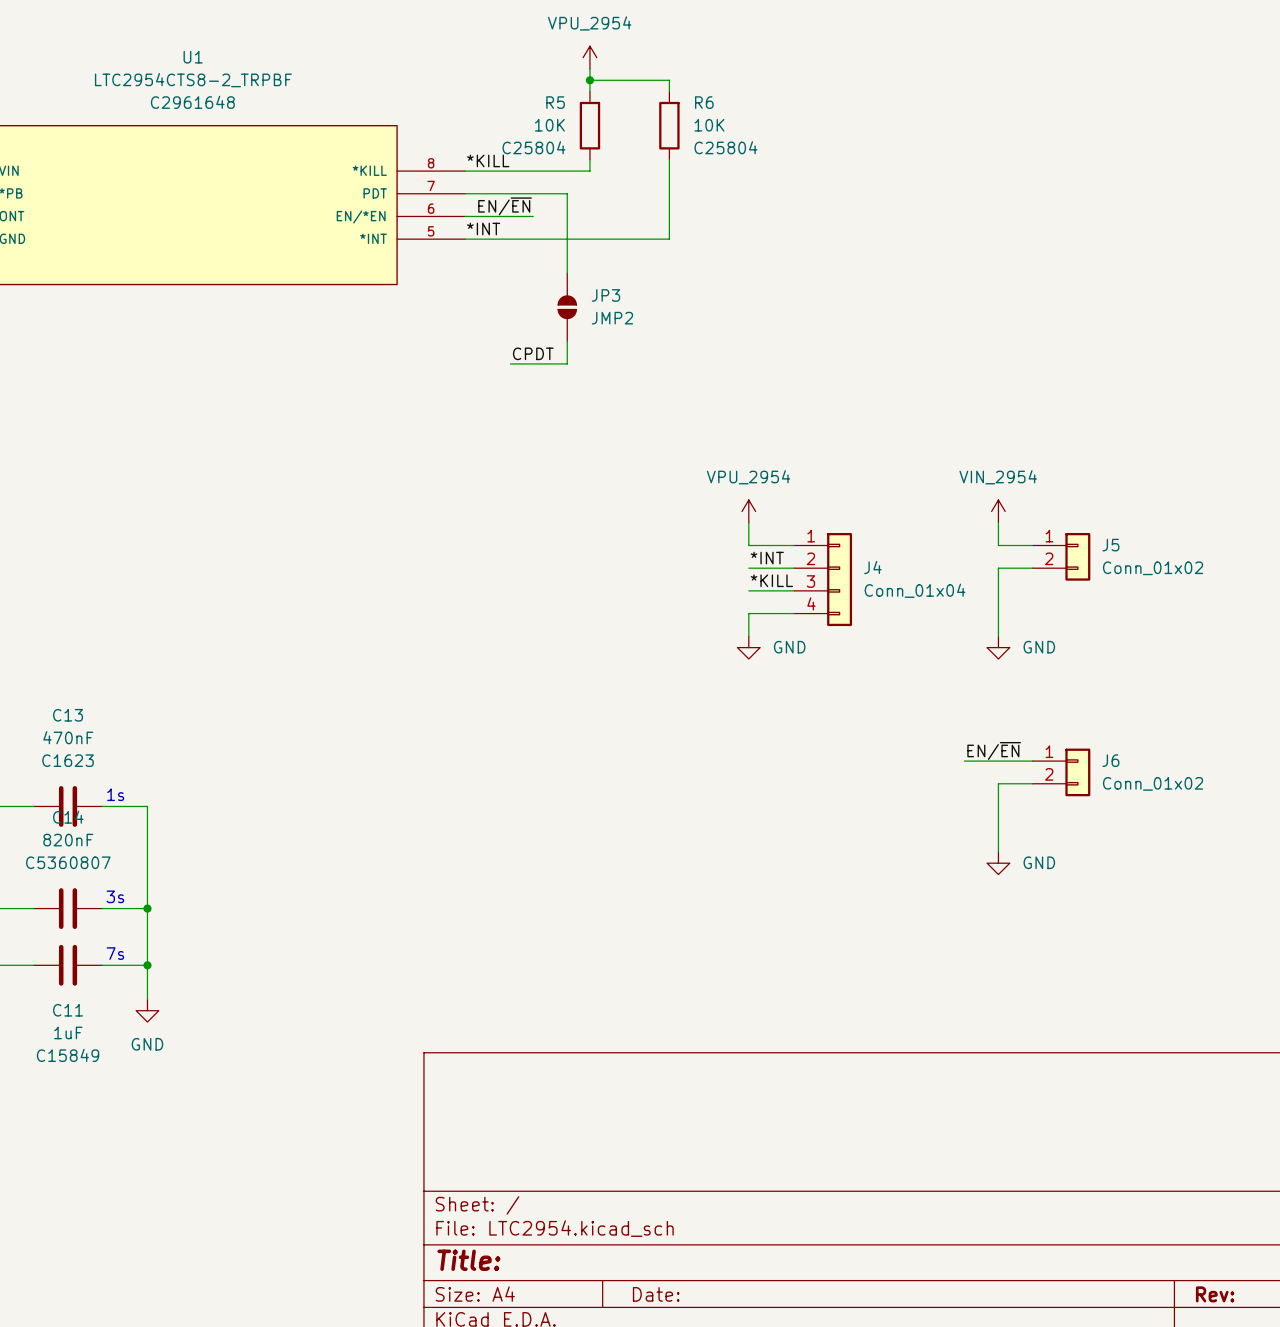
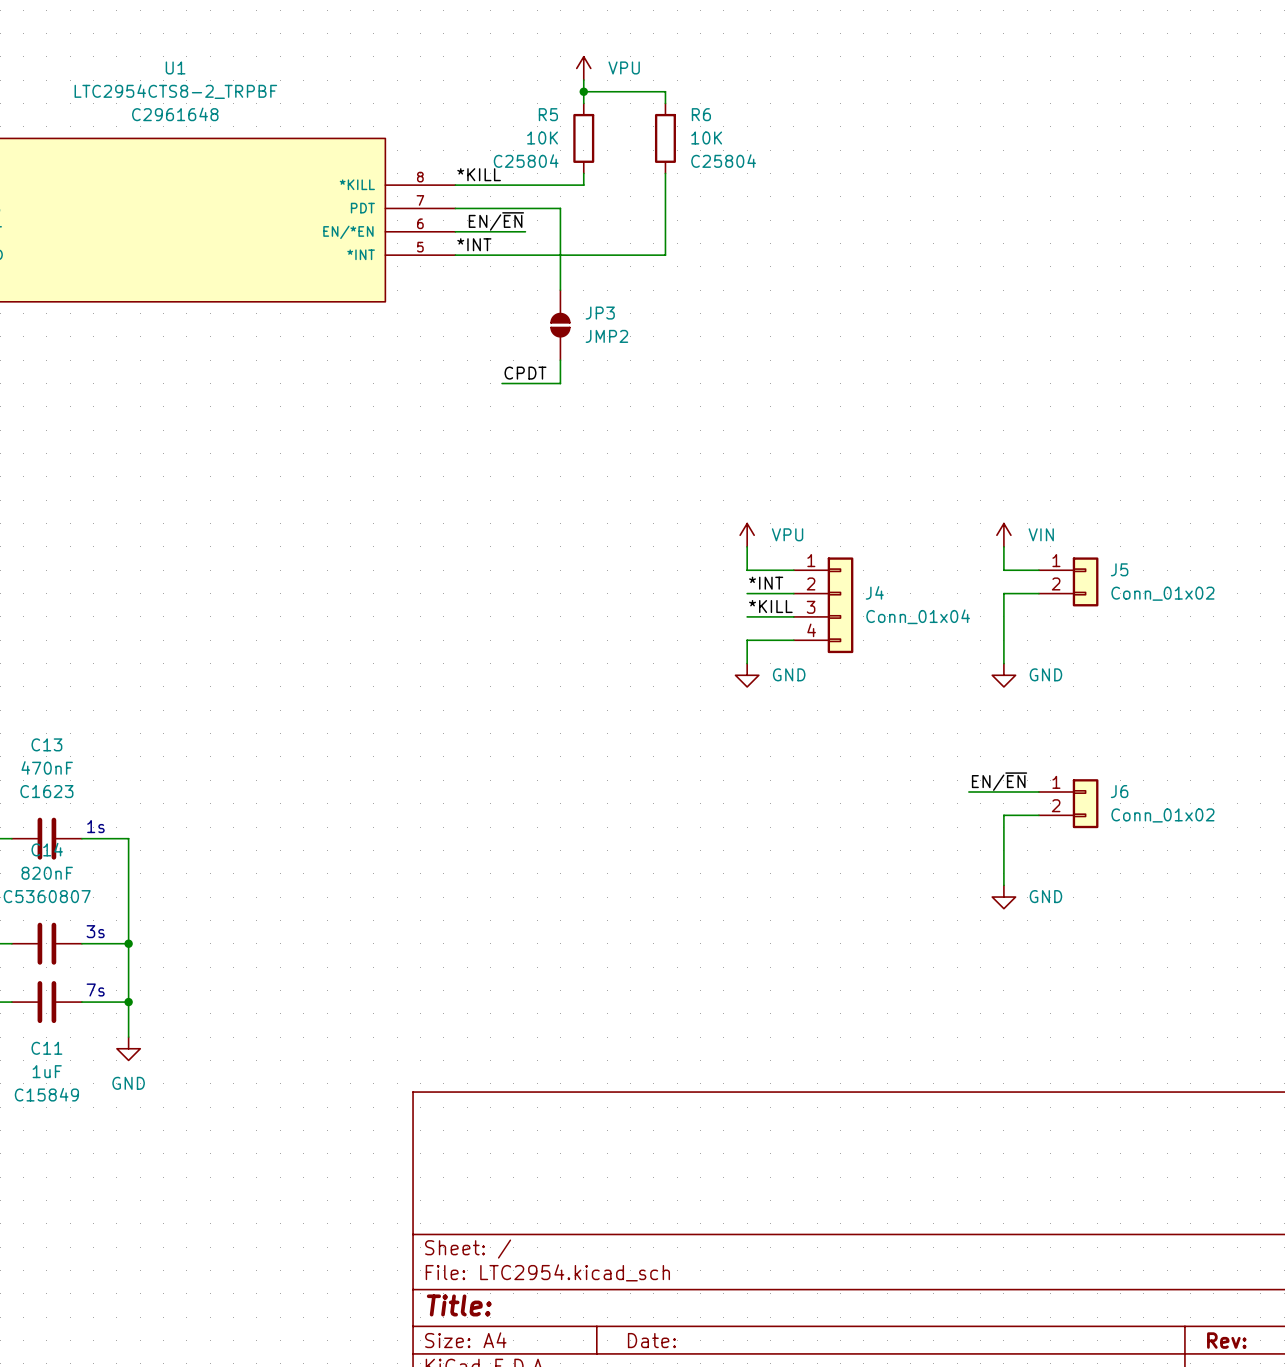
power symbol: VPU_2954 (589, 57) -> VPU (583, 68)
power symbol: VPU_2954 (748, 511) -> VPU (747, 535)
power symbol: VIN_2954 (998, 511) -> VIN (1003, 535)

